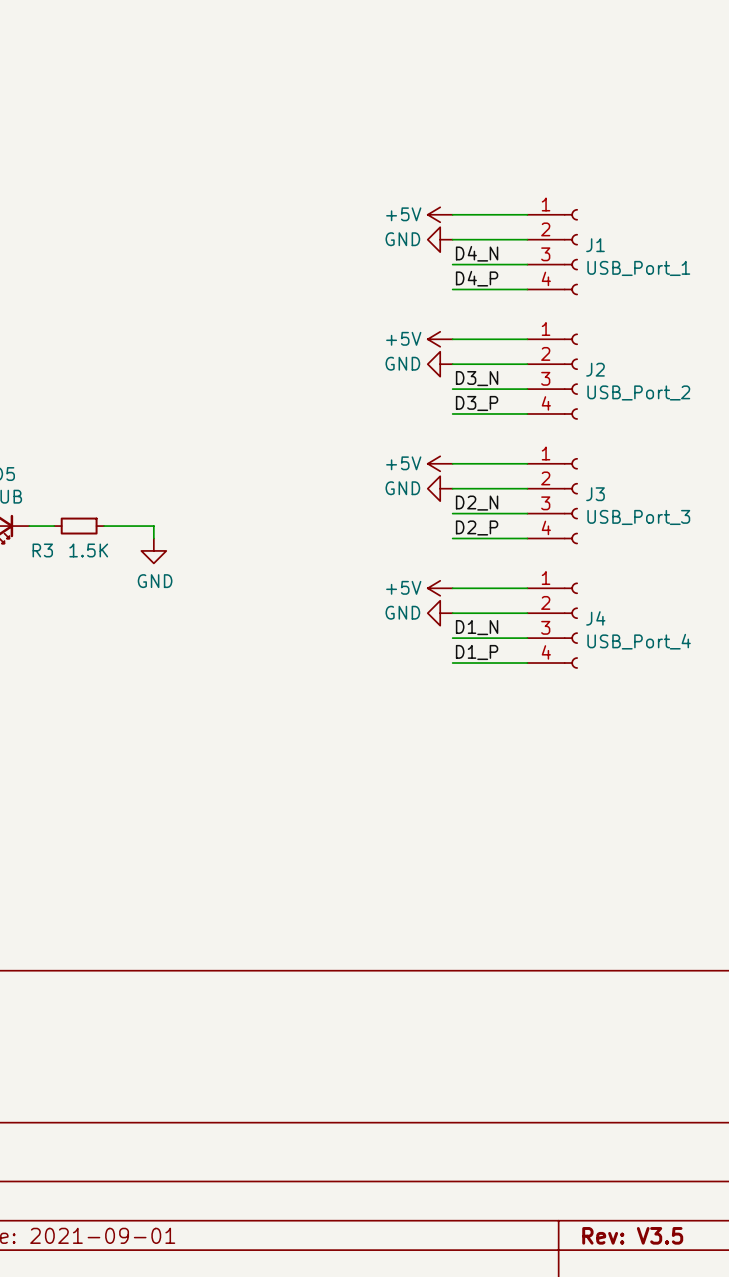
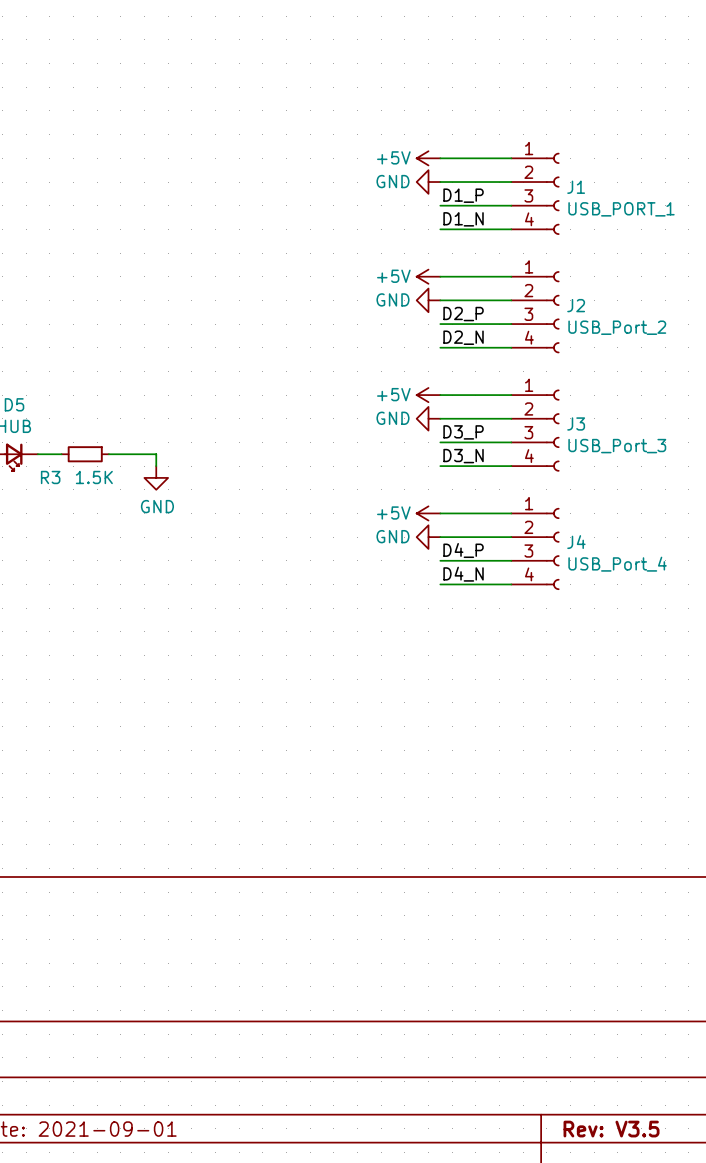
label: D4_N (477, 253) -> D1_P (463, 195)
J1 value: USB_Port_1 (638, 268) -> USB_PORT_1 (621, 209)
label: D4_P (477, 278) -> D1_N (463, 219)
label: D3_N (477, 378) -> D2_P (463, 314)
label: D3_P (477, 403) -> D2_N (463, 337)
label: D2_N (477, 503) -> D3_P (463, 432)
label: D2_P (477, 527) -> D3_N (463, 456)
label: D1_N (477, 627) -> D4_P (463, 550)
label: D1_P (477, 652) -> D4_N (463, 574)

